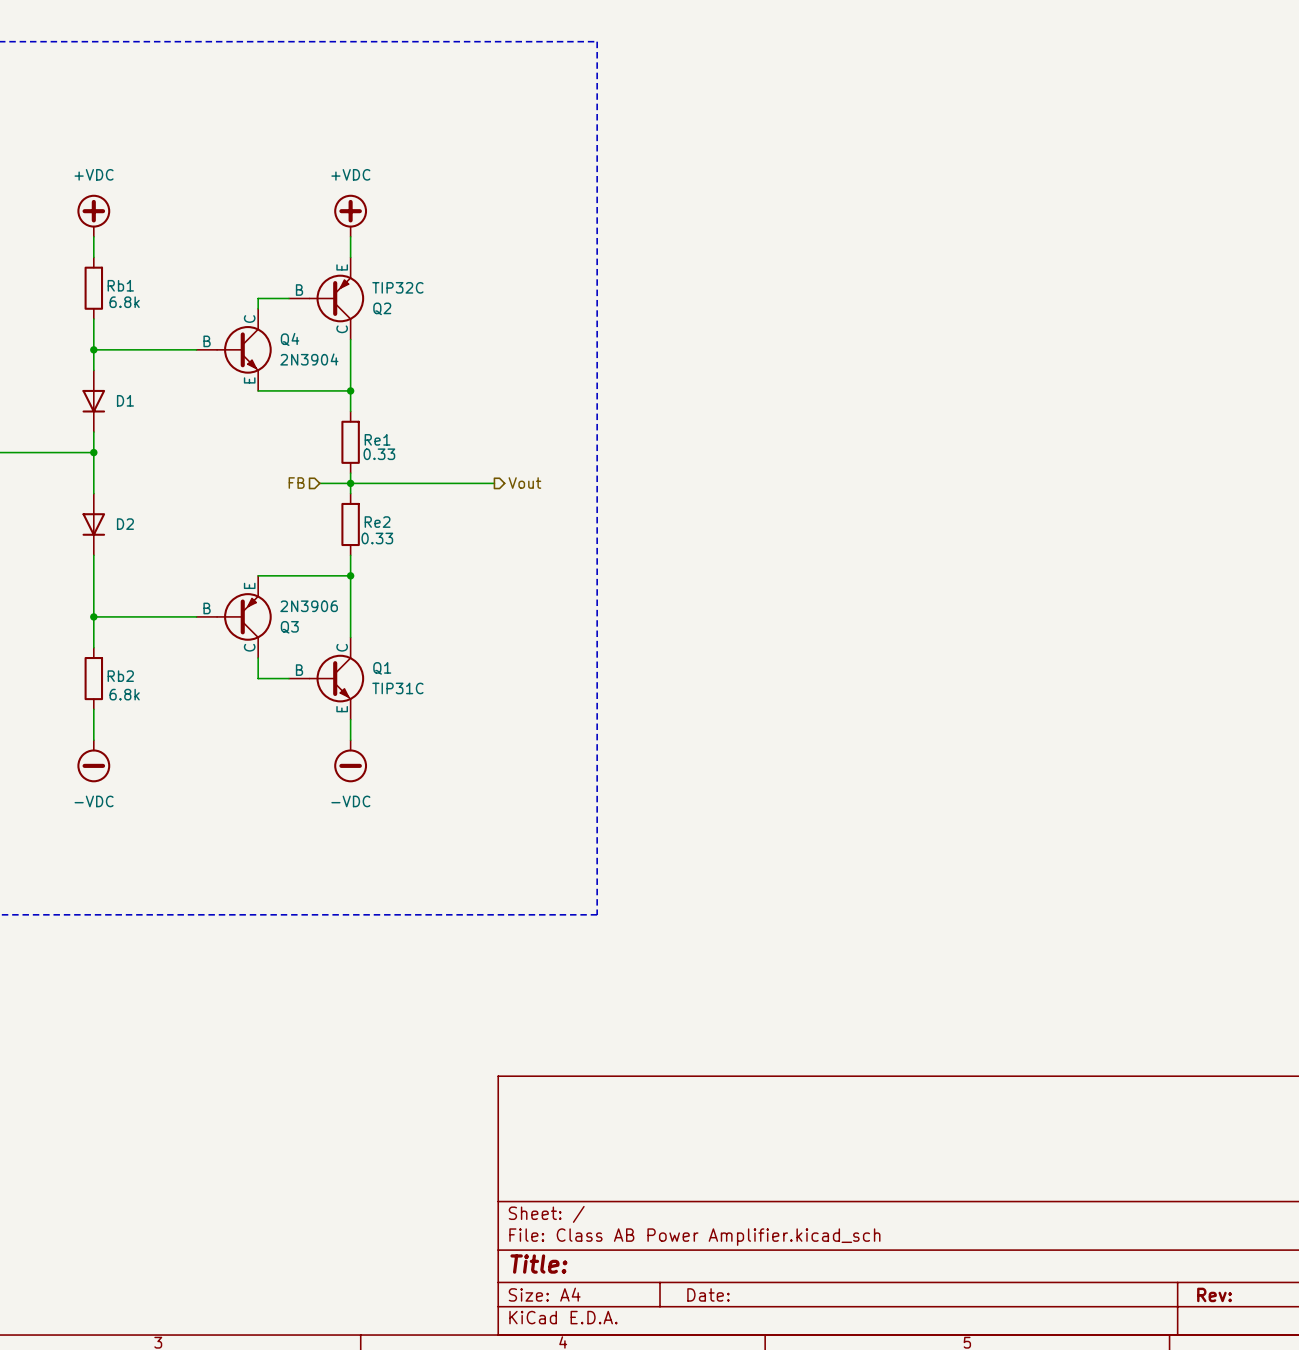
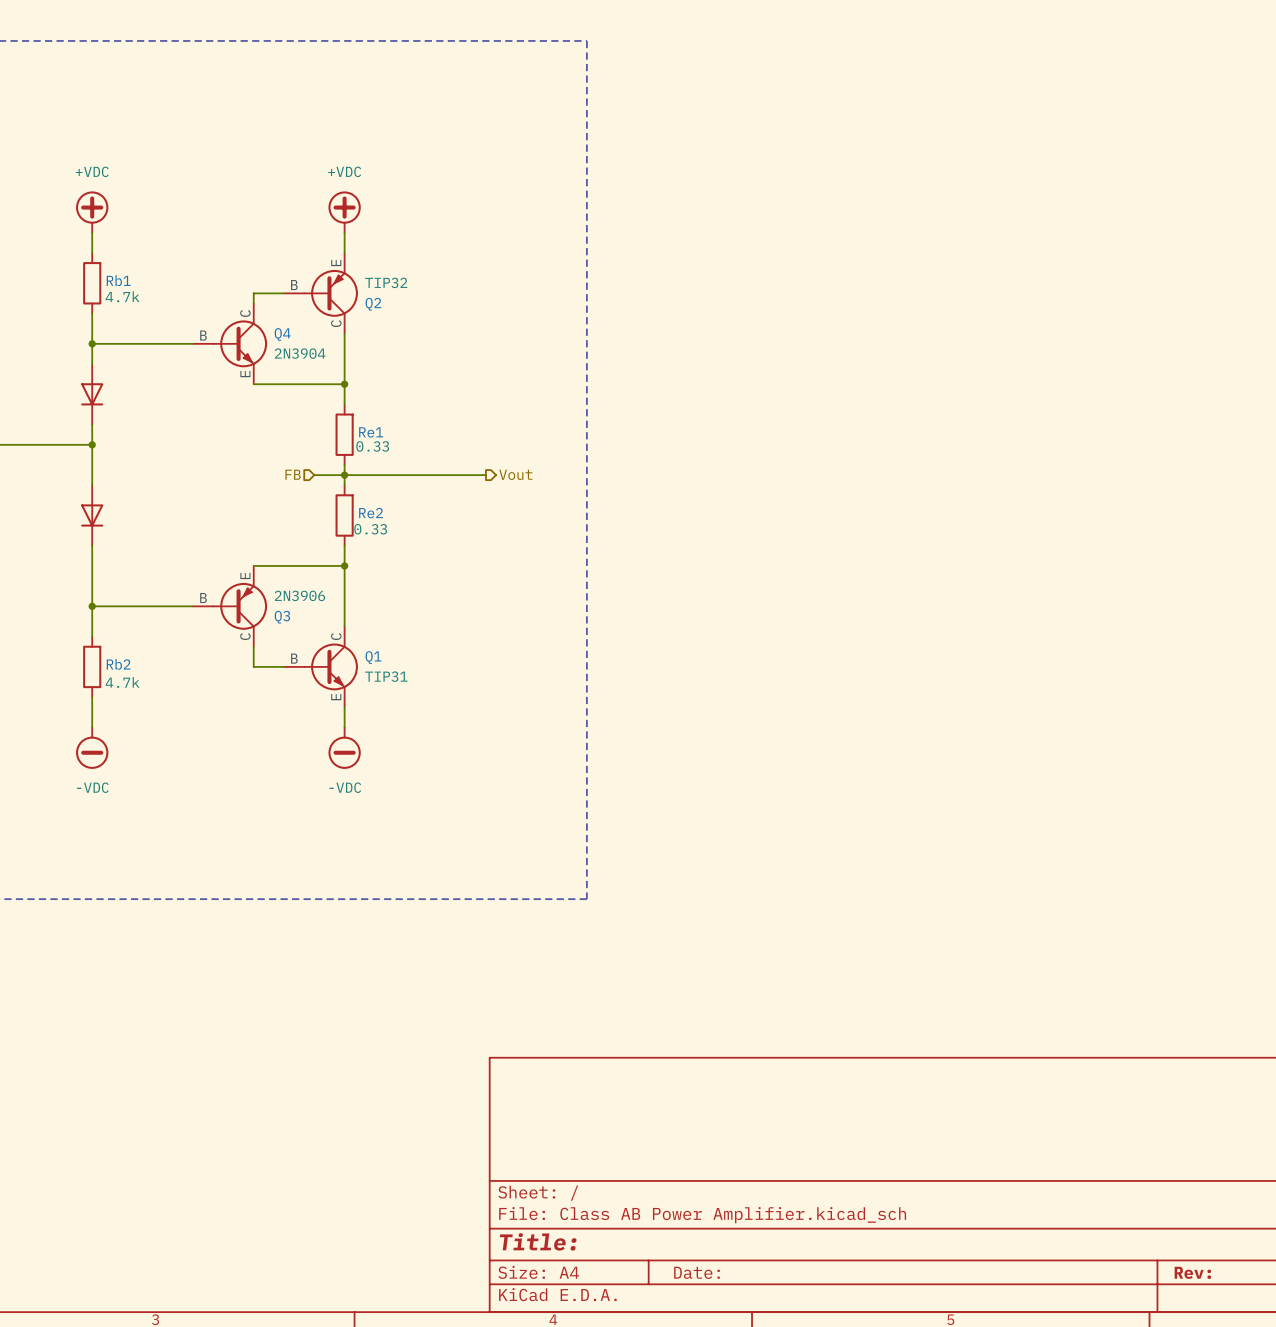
Q2 value: TIP32C (397, 287) -> TIP32 (386, 282)
Rb1 value: 6.8k (124, 302) -> 4.7k (122, 296)
D1 name: D1 (125, 400) -> none
D2 name: D2 (125, 524) -> none
Q1 value: TIP31C (397, 688) -> TIP31 (386, 676)
Rb2 value: 6.8k (124, 694) -> 4.7k (122, 682)

